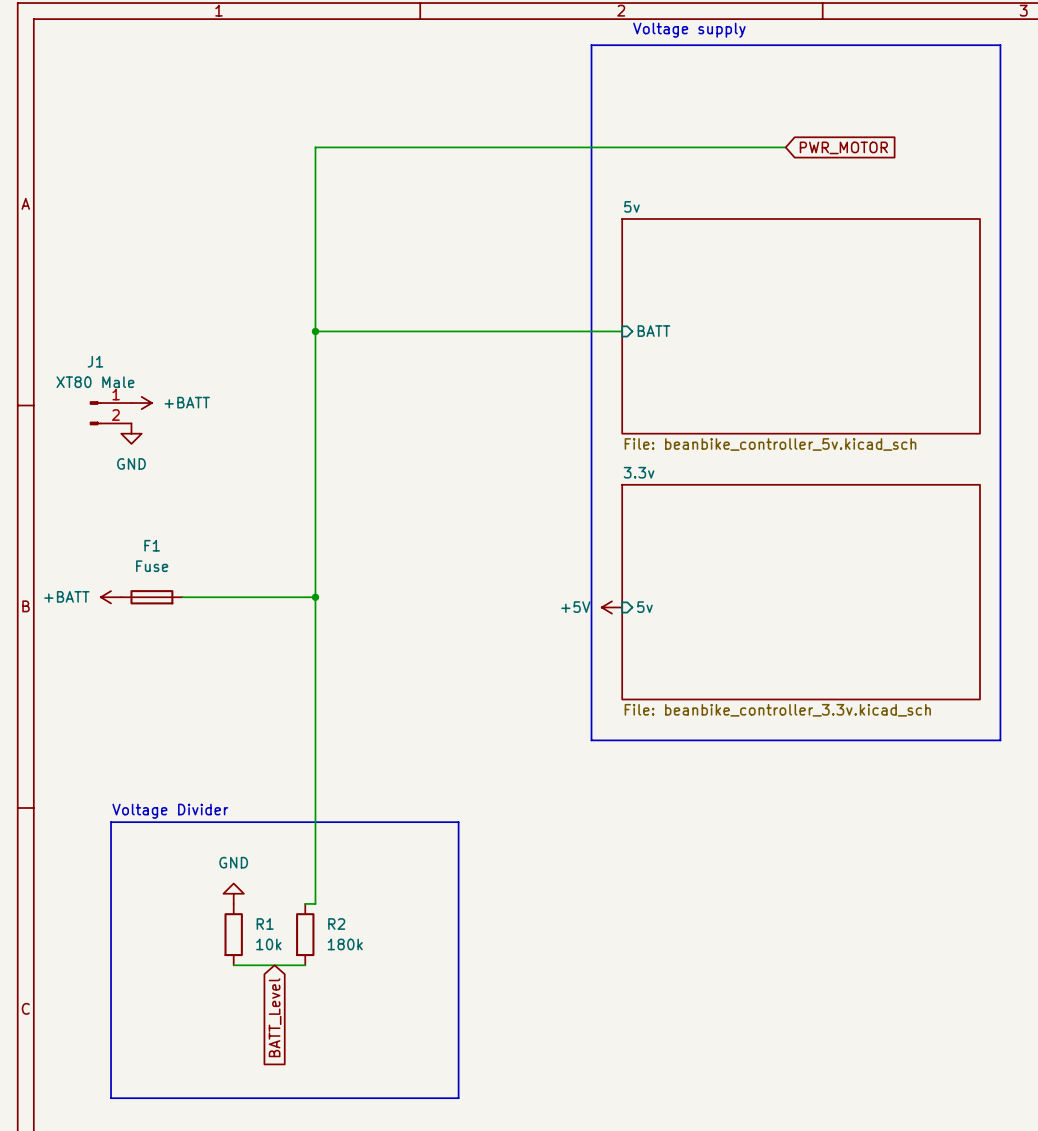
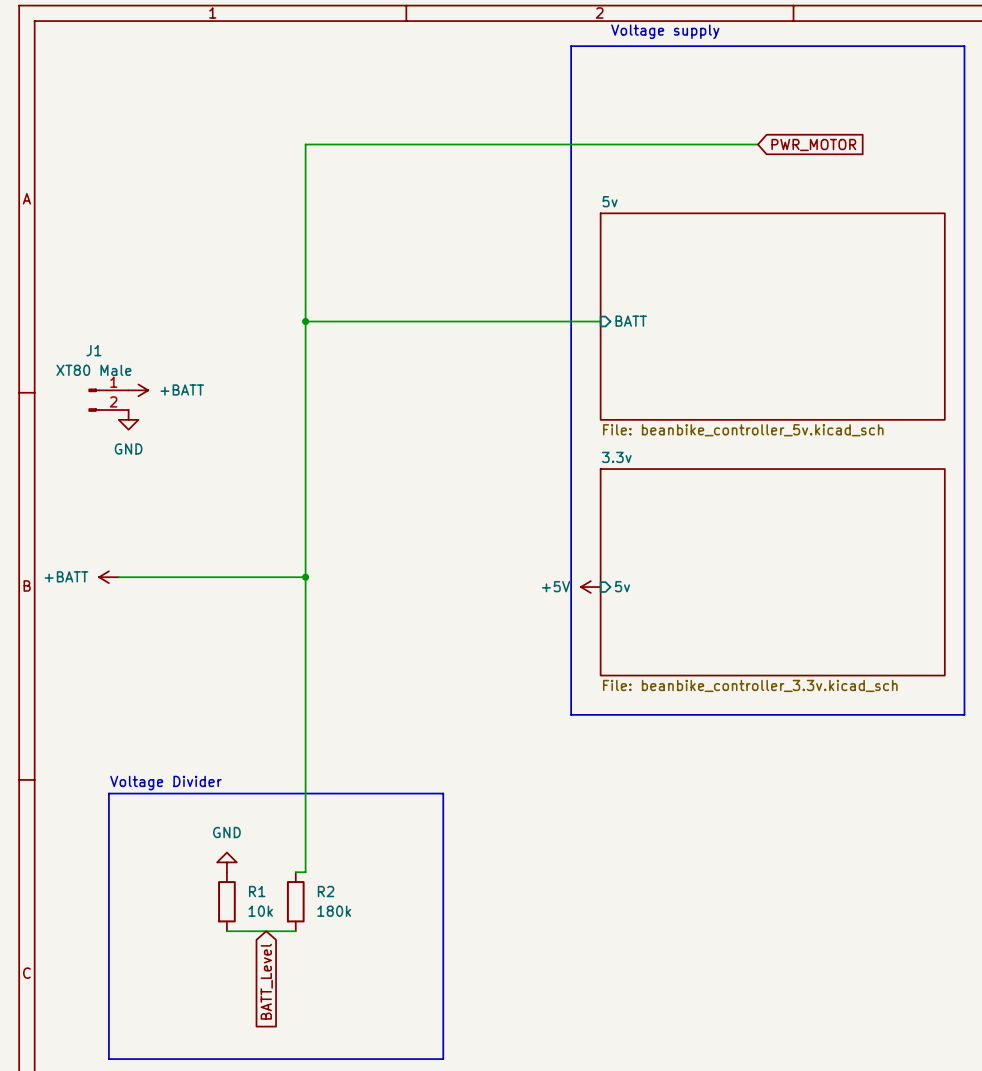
F1: Fuse (151, 597) -> none

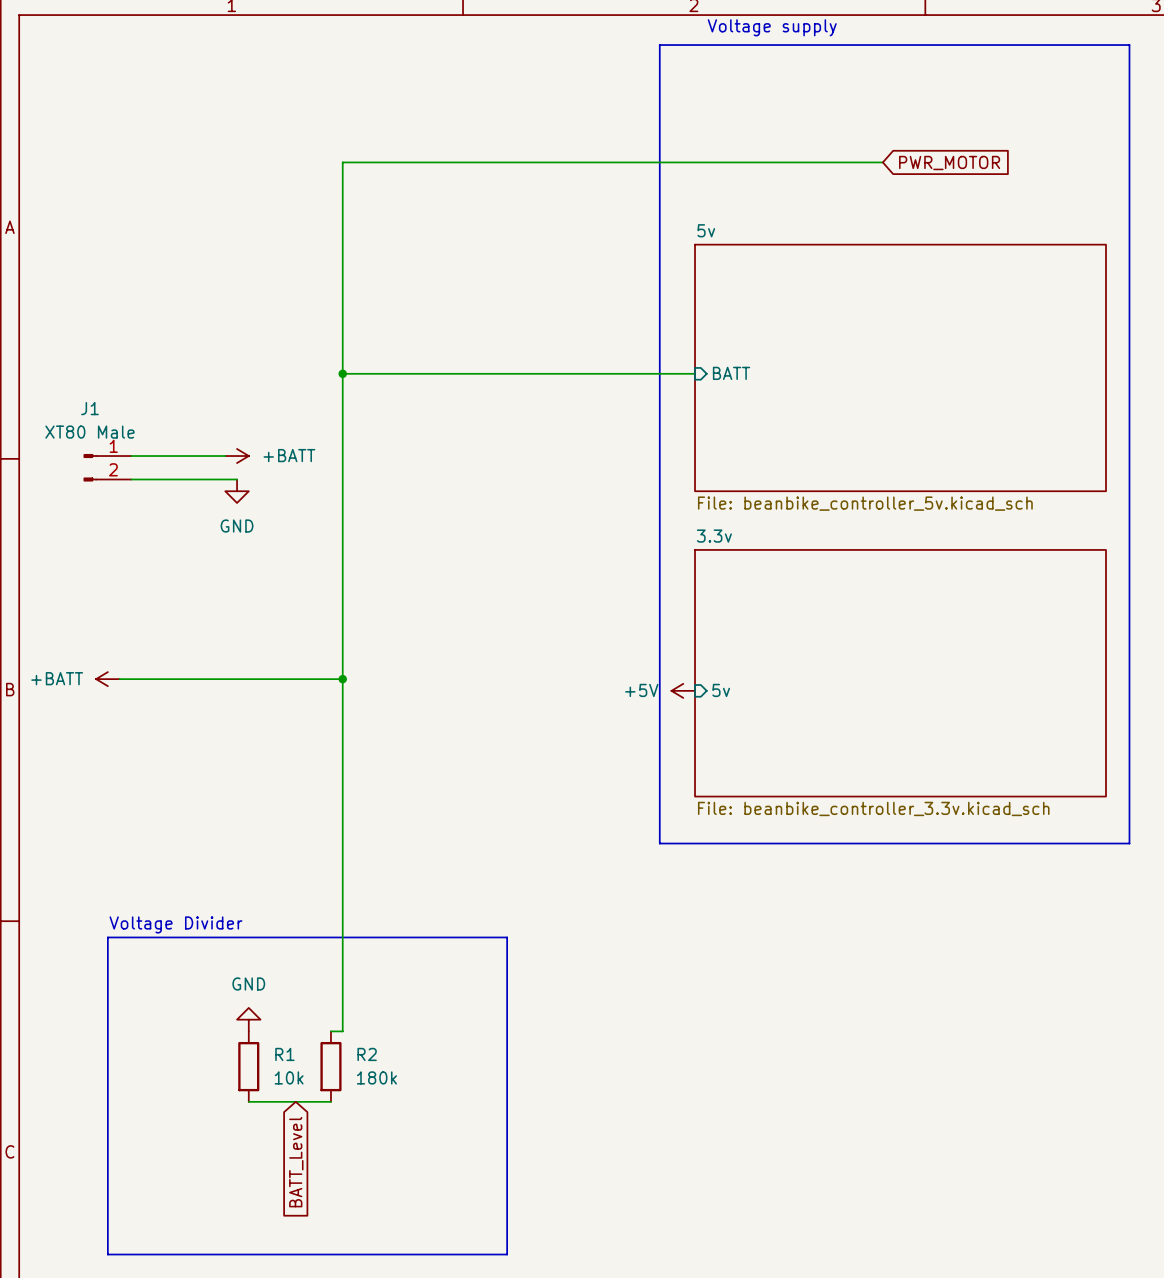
wire: none -> (131, 456) (225, 456)
power symbol position: +BATT (138, 390) -> +BATT (237, 456)
wire: none -> (131, 479) (237, 479)
power symbol position: GND (128, 419) -> GND (237, 491)

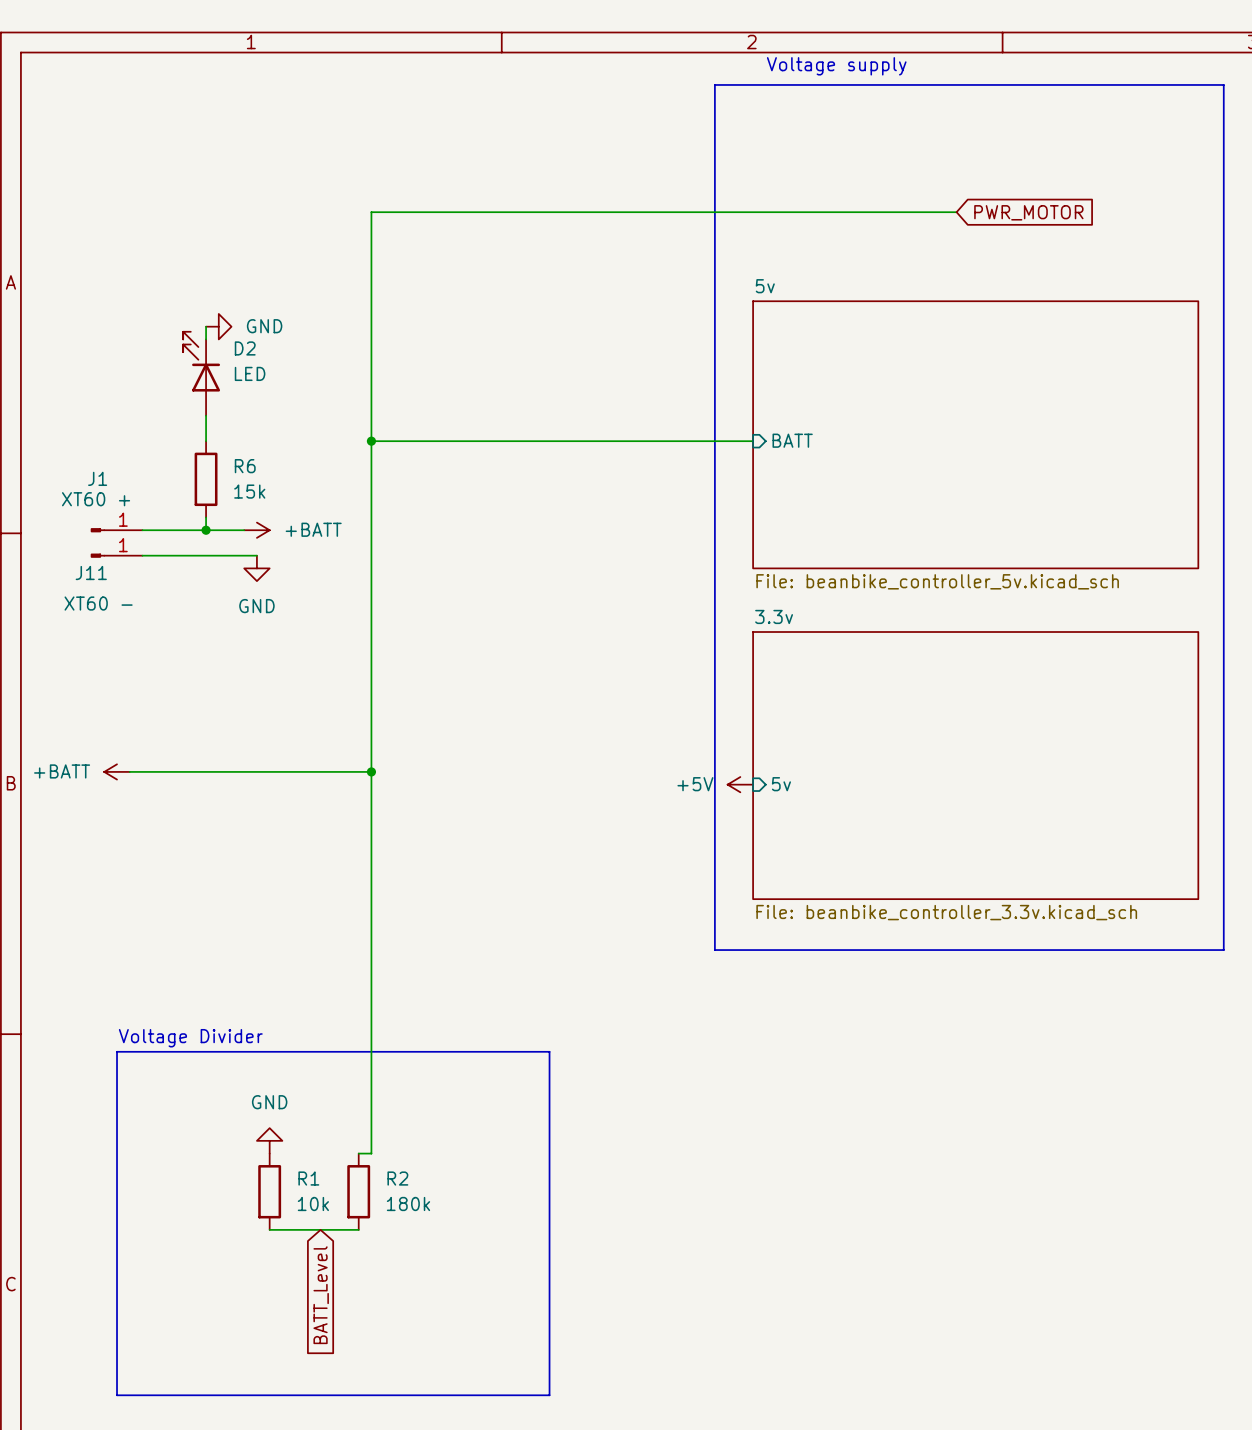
wire: none -> (206, 326) (206, 339)
power symbol: none -> GND (218, 326)
D2: none -> LED (201, 373)
wire: none -> (206, 415) (206, 441)
R6: none -> 15k (206, 479)
J1 value: XT80 Male (89, 432) -> XT60 + (96, 499)
wire: none -> (206, 517) (206, 530)
J1 symbol: [83, 454, 132, 482] -> [90, 528, 143, 533]
junction: none -> (206, 530)
J11: none -> XT60 - (116, 555)

